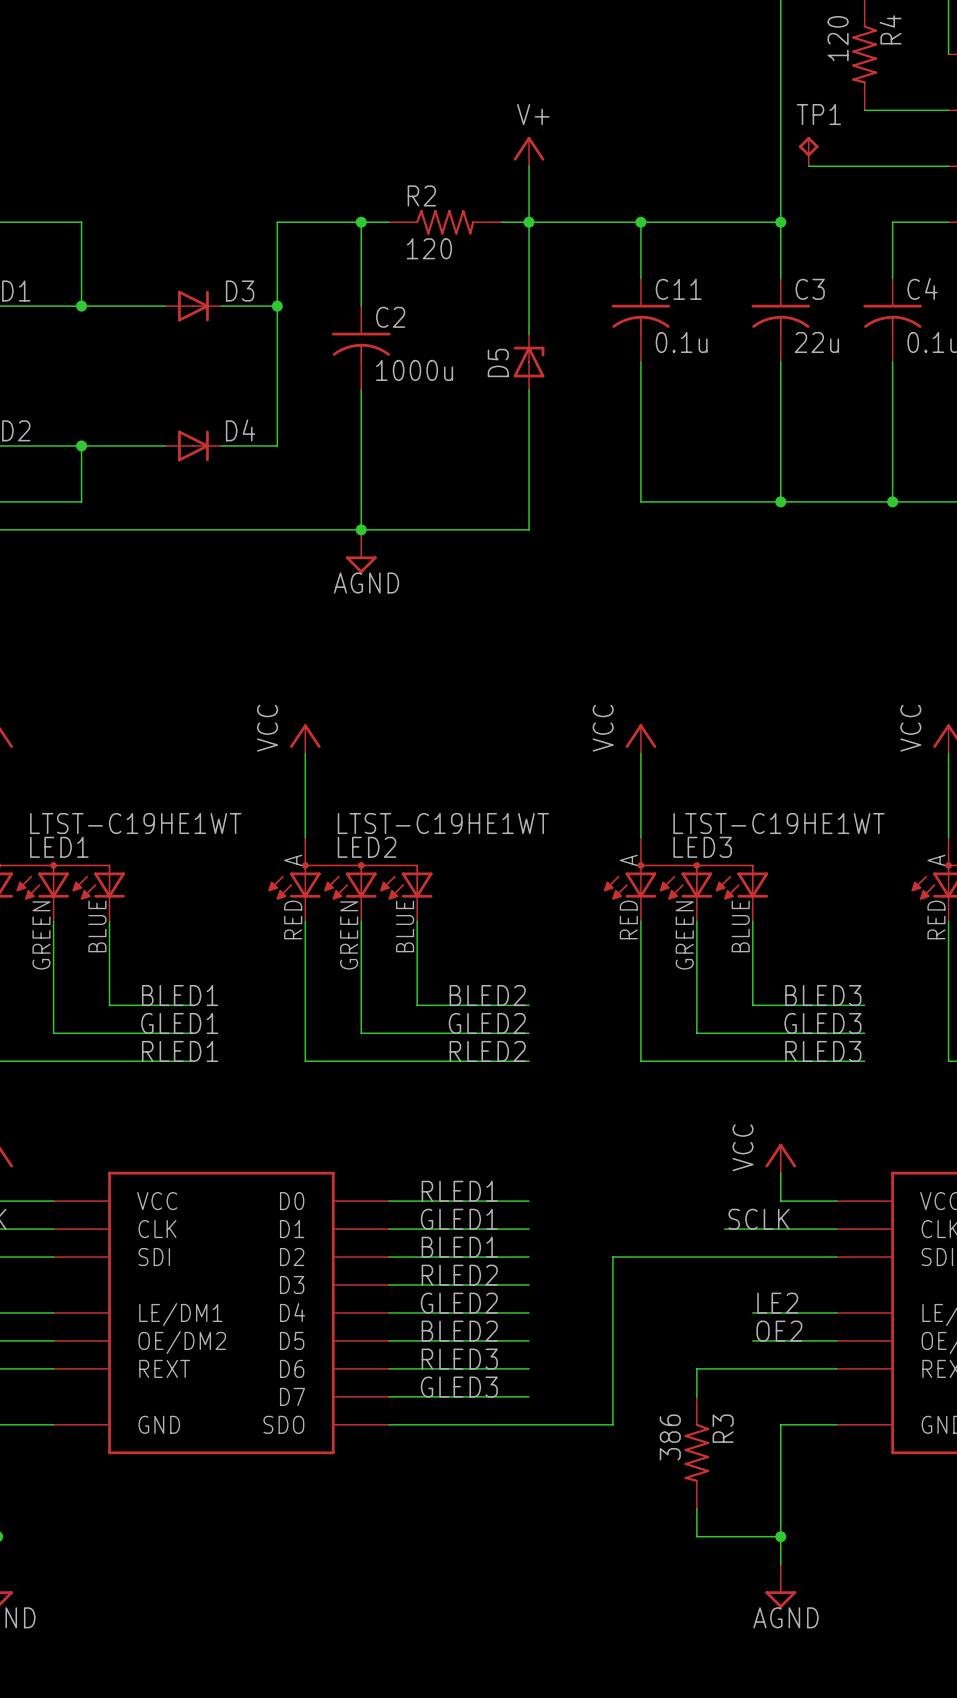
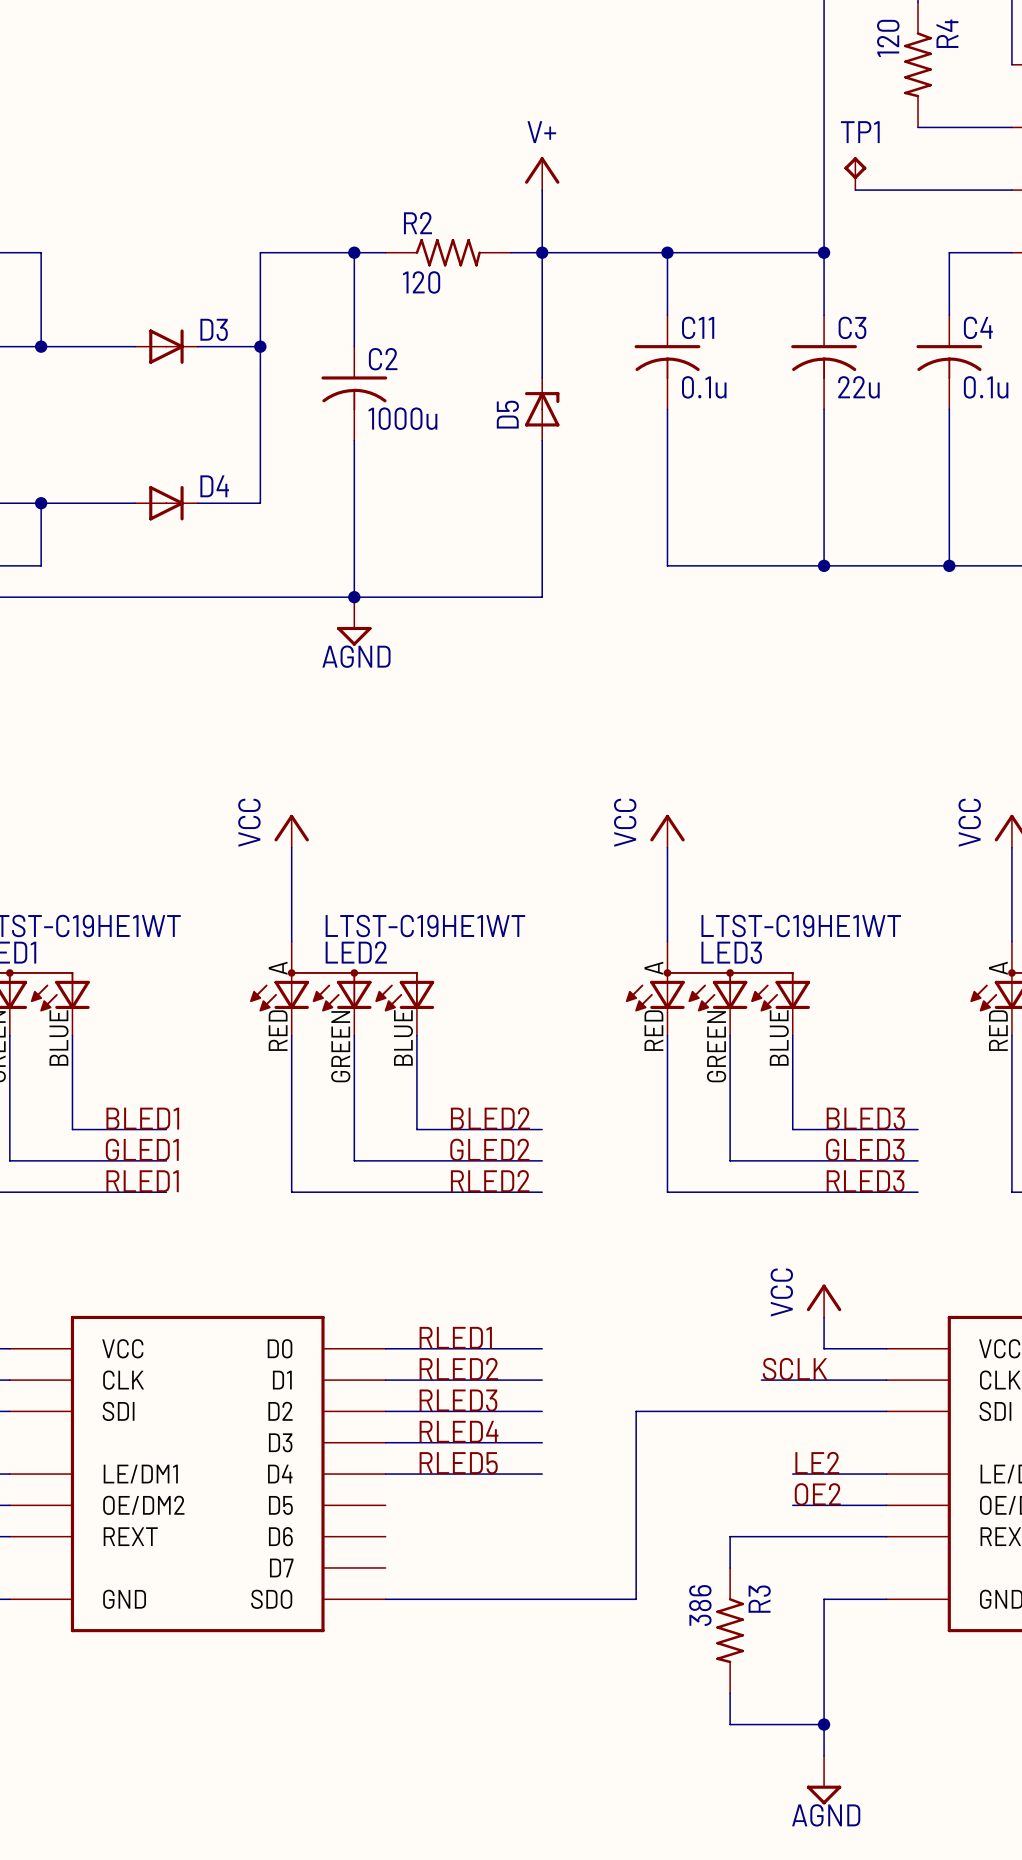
label: GLED1 (459, 1219) -> RLED2 (458, 1369)
label: BLED1 (459, 1247) -> RLED3 (458, 1400)
label: RLED2 (459, 1275) -> RLED4 (459, 1431)
label: GLED2 (459, 1303) -> RLED5 (458, 1463)
label: BLED2 (459, 1331) -> none
wire: (389, 1340) (529, 1340) -> none
label: RLED3 (459, 1359) -> none
wire: (389, 1368) (529, 1368) -> none
label: GLED3 (459, 1387) -> none
wire: (389, 1396) (529, 1396) -> none

